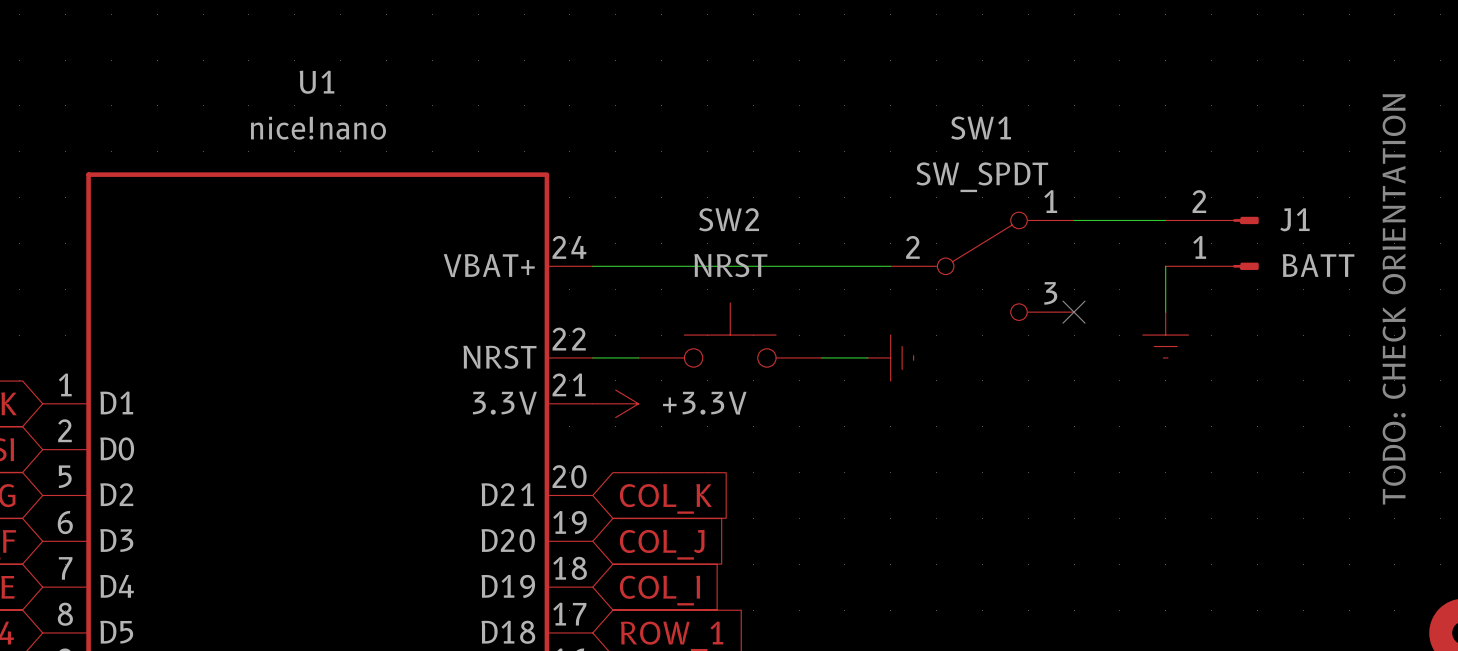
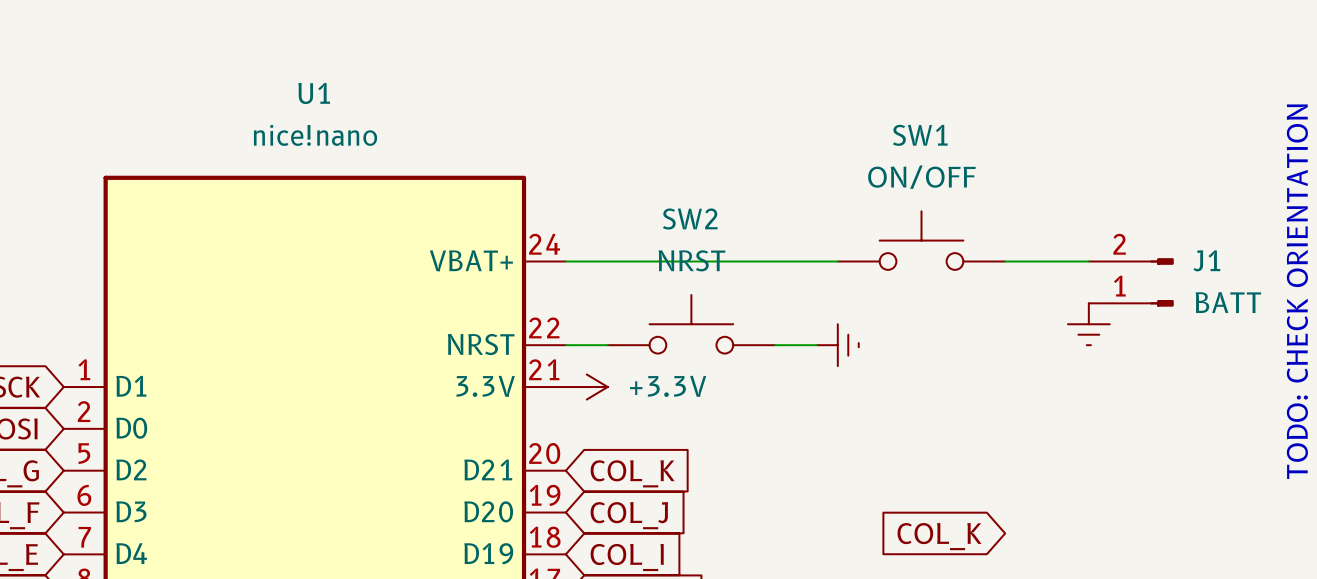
SW1 value: SW_SPDT (982, 177) -> ON/OFF (921, 177)
SW1 symbol: [890, 212, 1075, 321] -> [837, 211, 1006, 270]
wire: (1074, 220) (1165, 220) -> none
J1 position: (1212, 243) -> (1131, 282)
wire: (1165, 266) (1165, 312) -> (1088, 261) (1005, 261)
no-connect mark: (1074, 312) -> none
global label: none -> COL_K (939, 536)

